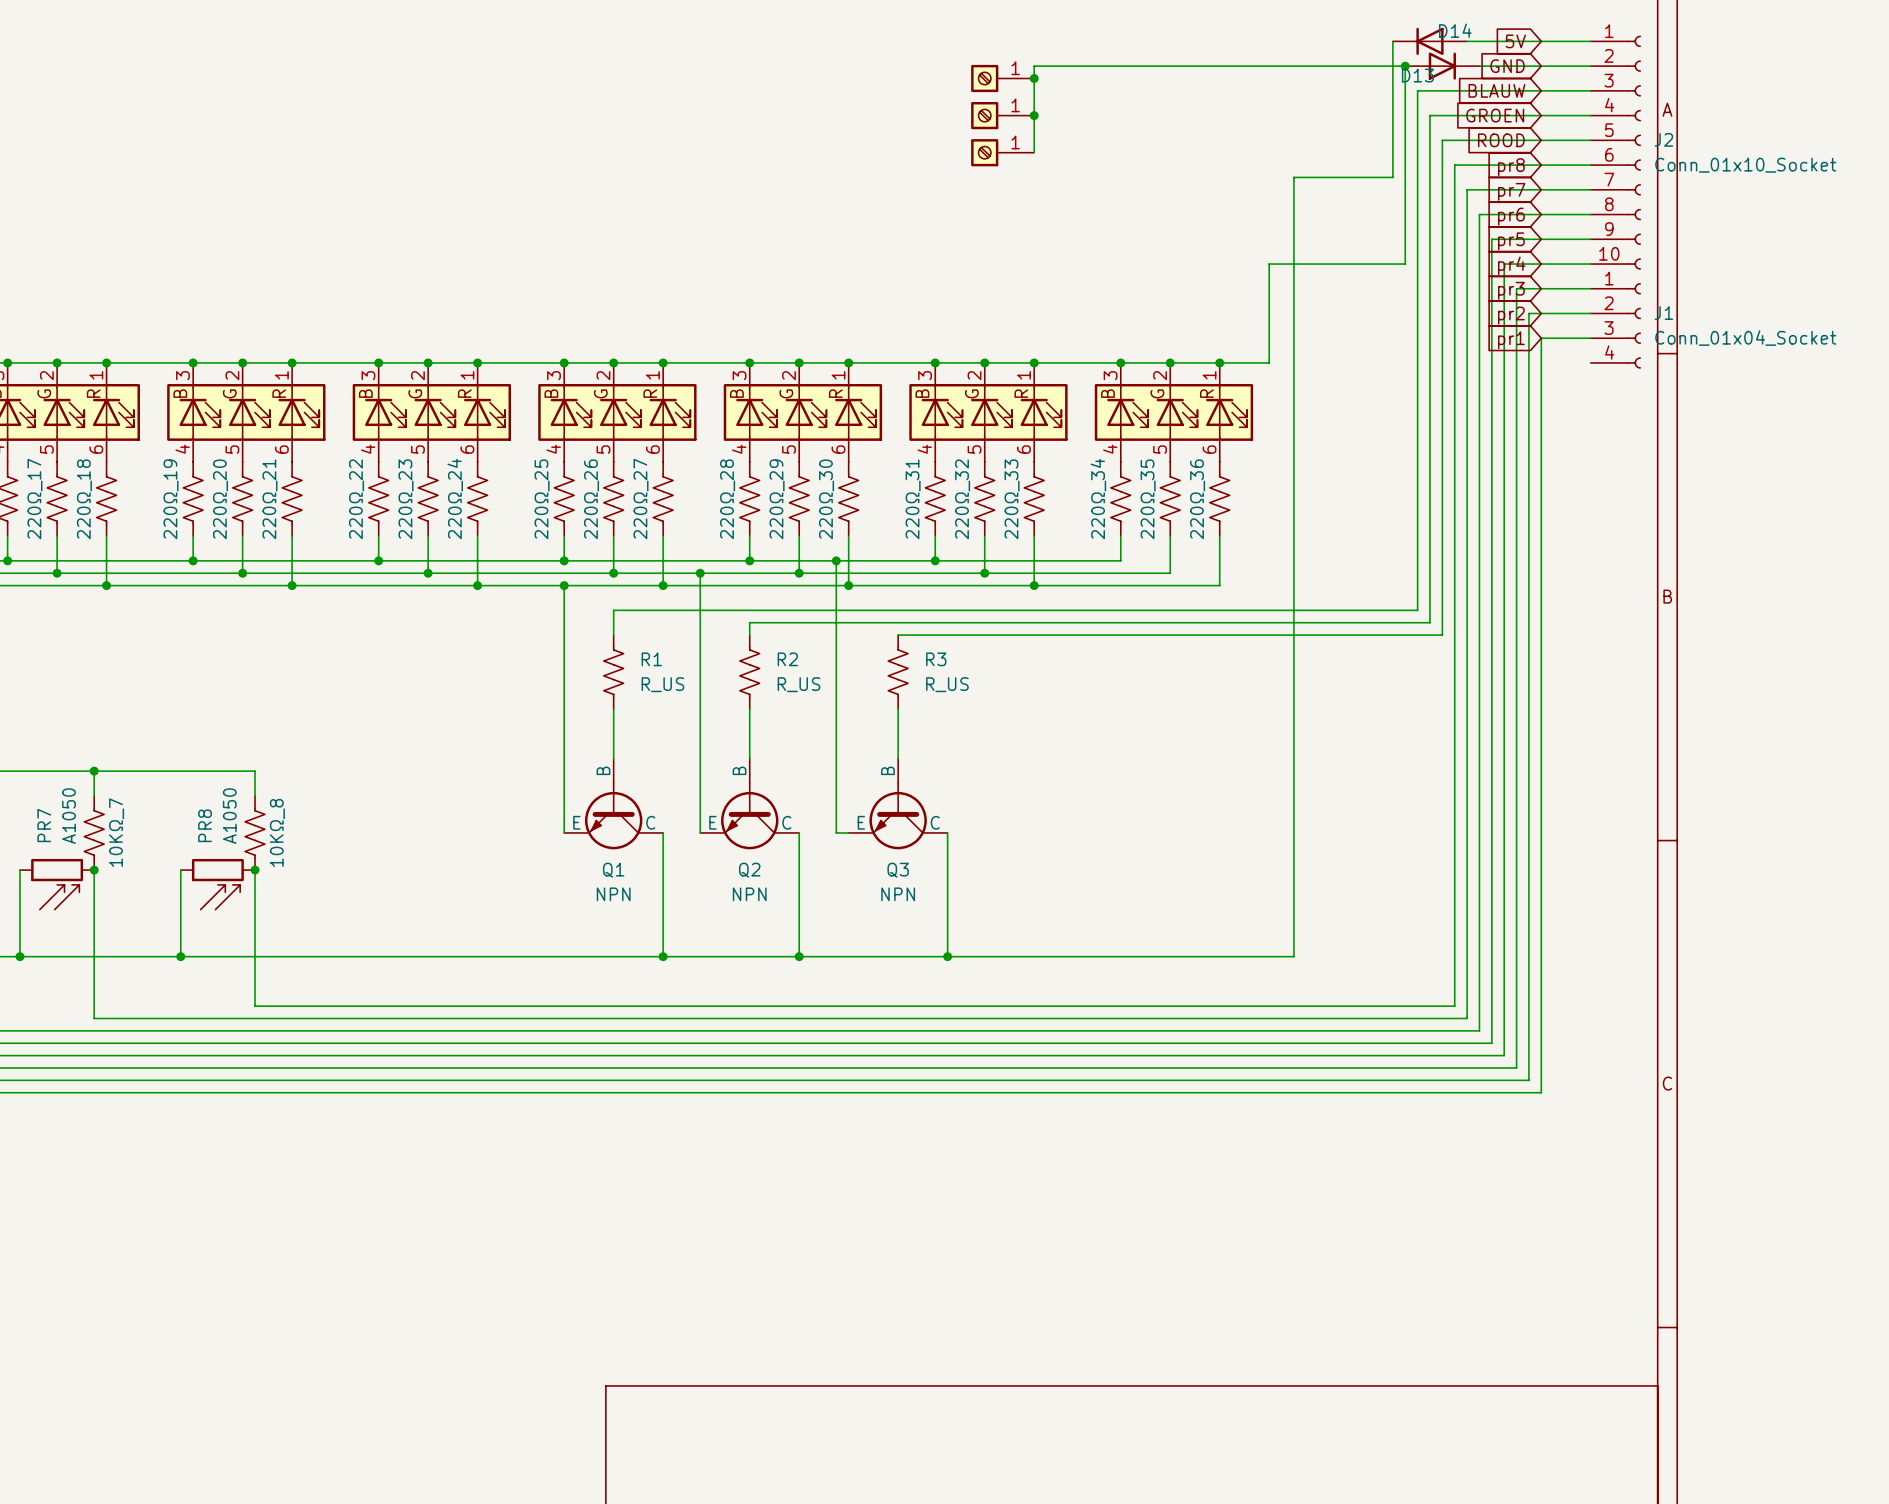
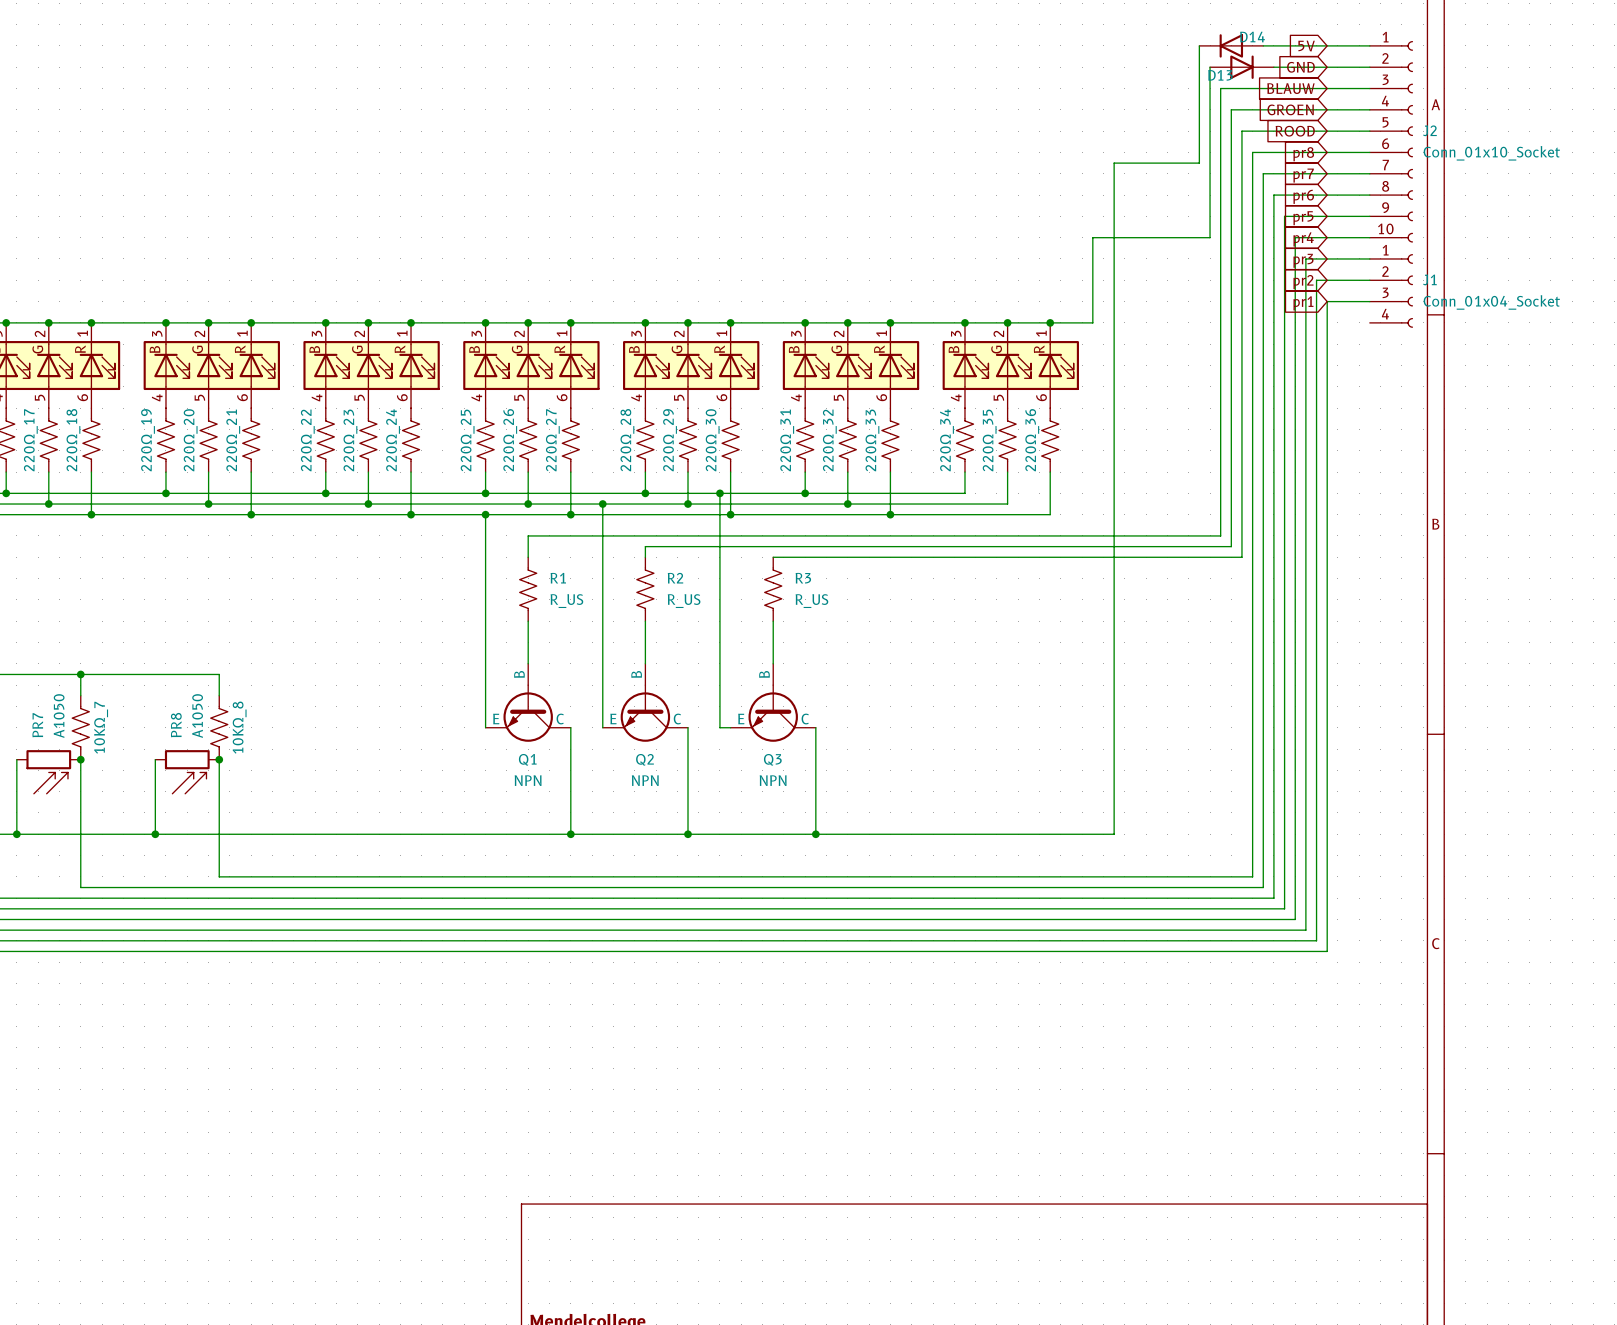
wire: (1405, 66) (1034, 66) (1034, 152) -> none
junction: (1405, 66) -> none
part: (1002, 78) -> none
junction: (1034, 78) -> none
part: (1002, 115) -> none
junction: (1034, 115) -> none
part: (1002, 152) -> none

